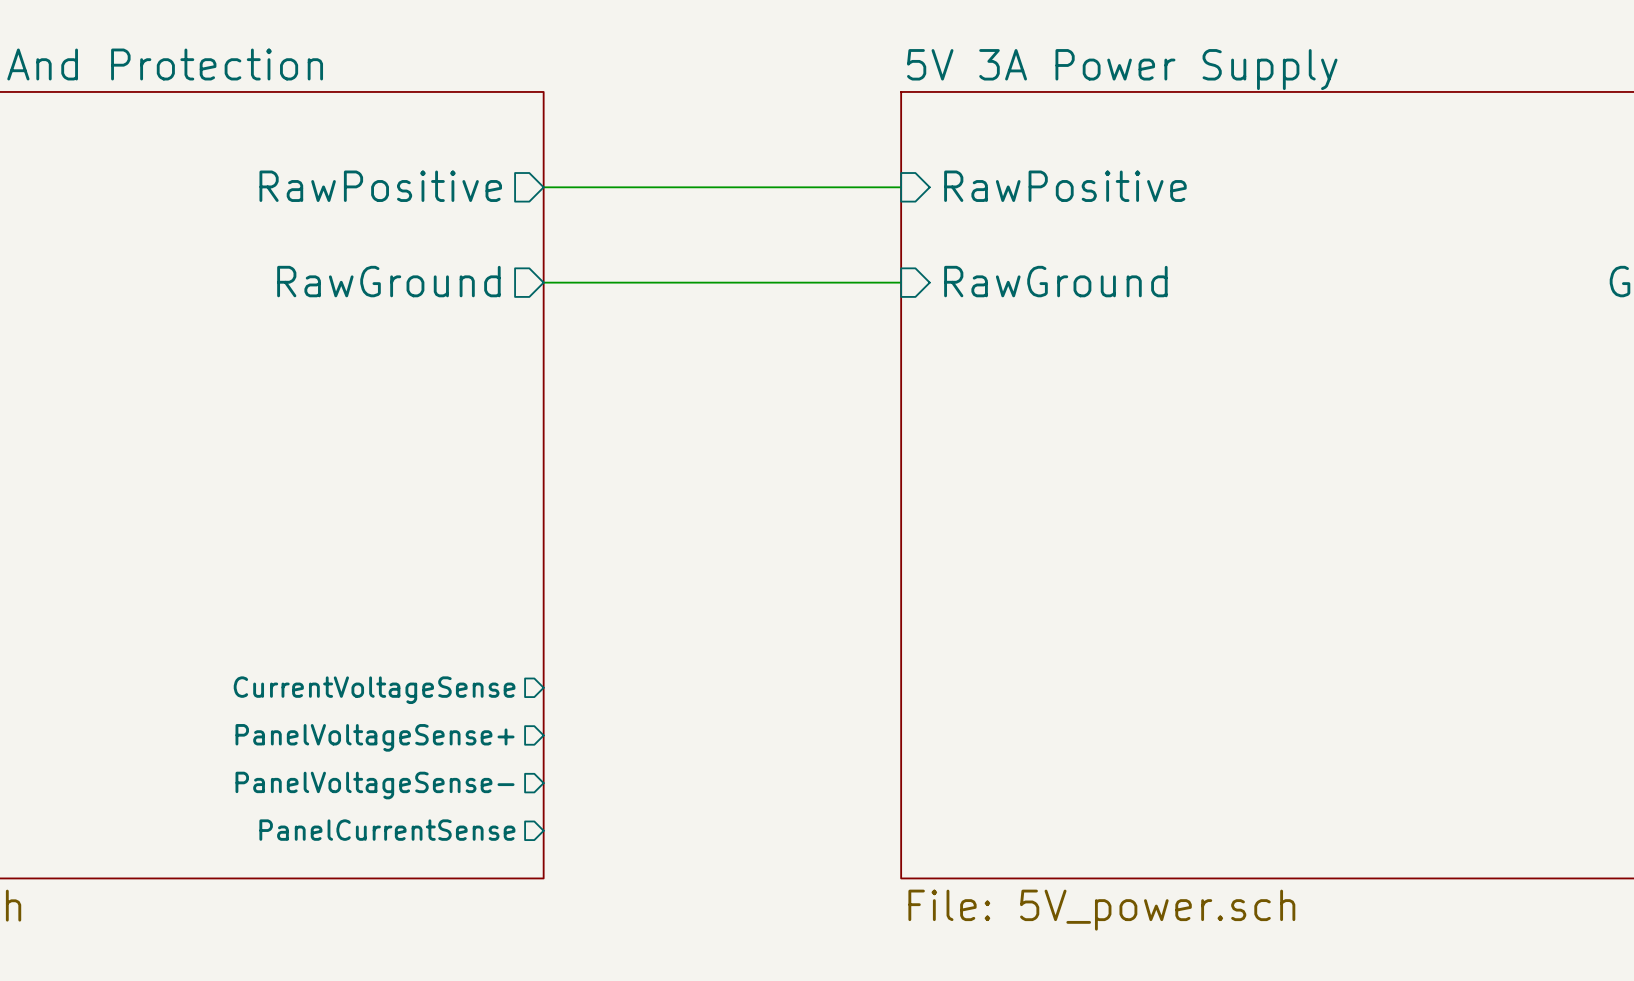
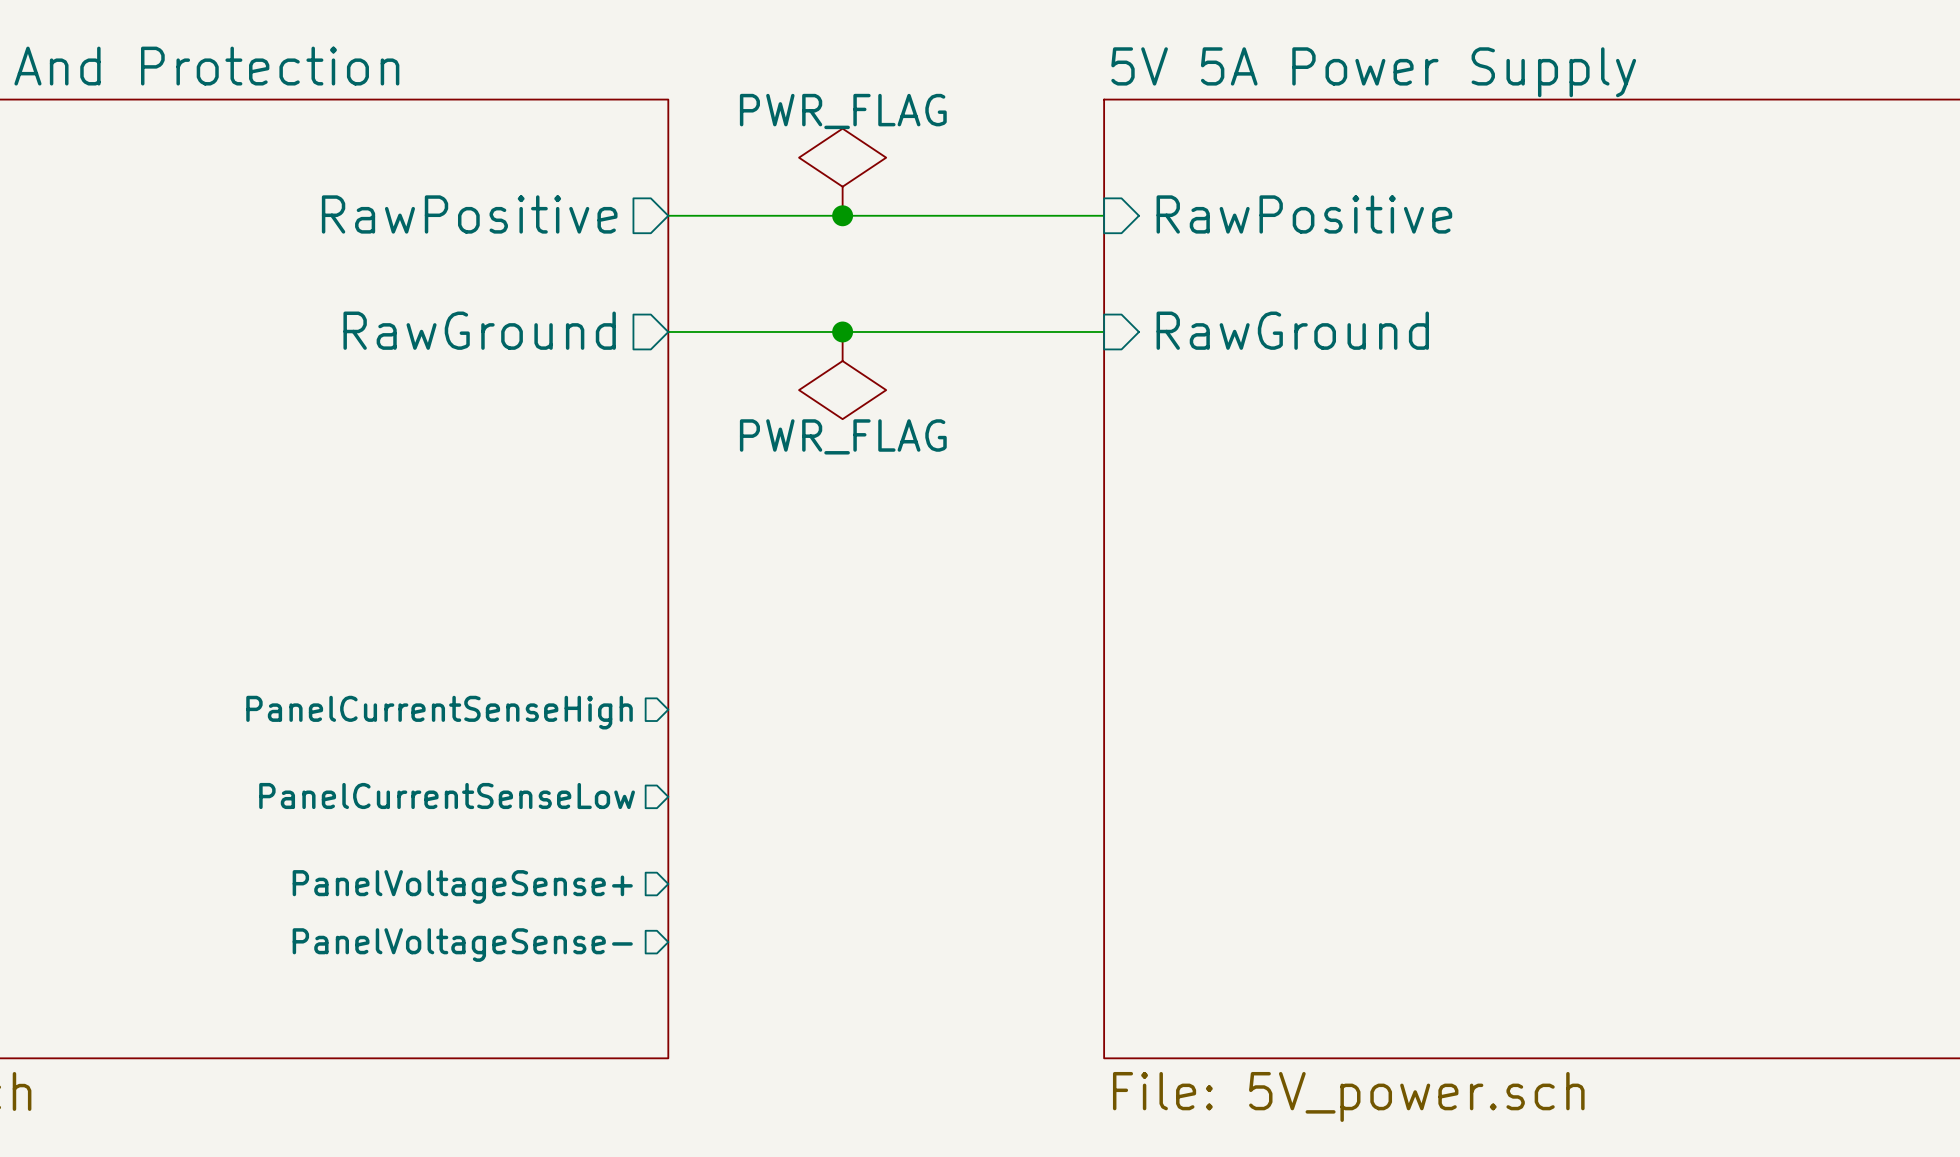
sheet 5V 3A Power Supply name: 5V 3A Power Supply (1122, 69) -> 5V 5A Power Supply (1373, 72)
power symbol: none -> PWR_FLAG (842, 172)
junction: none -> (842, 215)
junction: none -> (842, 331)
power symbol: none -> PWR_FLAG (842, 375)
sheet pin: none -> PanelCurrentSenseHigh (439, 712)
sheet pin: CurrentVoltageSense (374, 690) -> PanelCurrentSenseLow (447, 796)
sheet pin: PanelCurrentSense (387, 830) -> none

